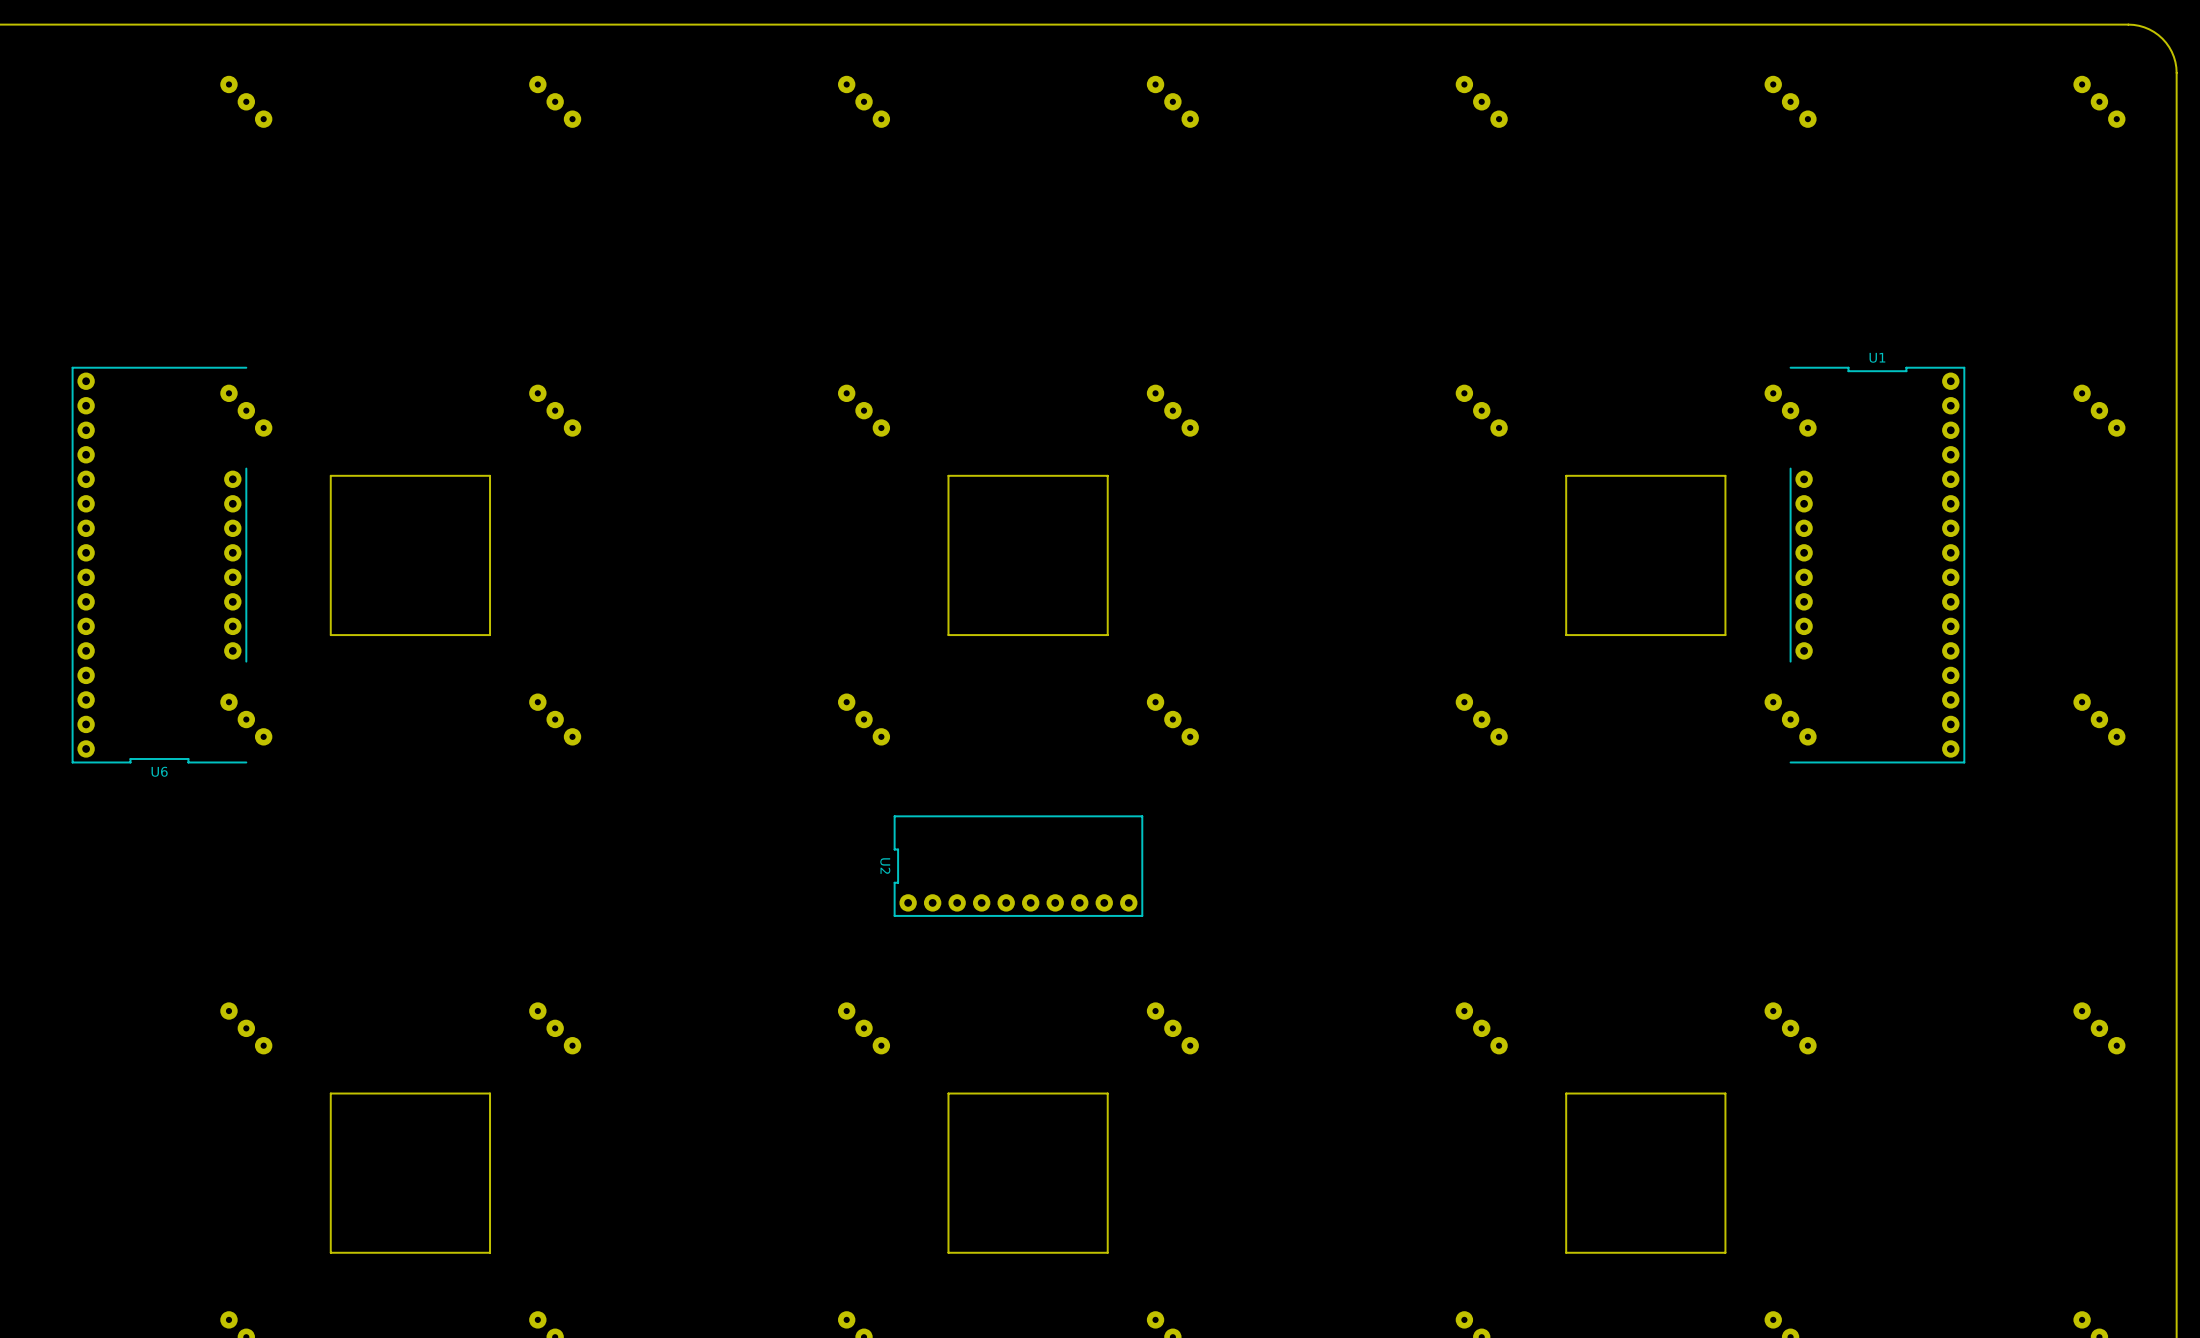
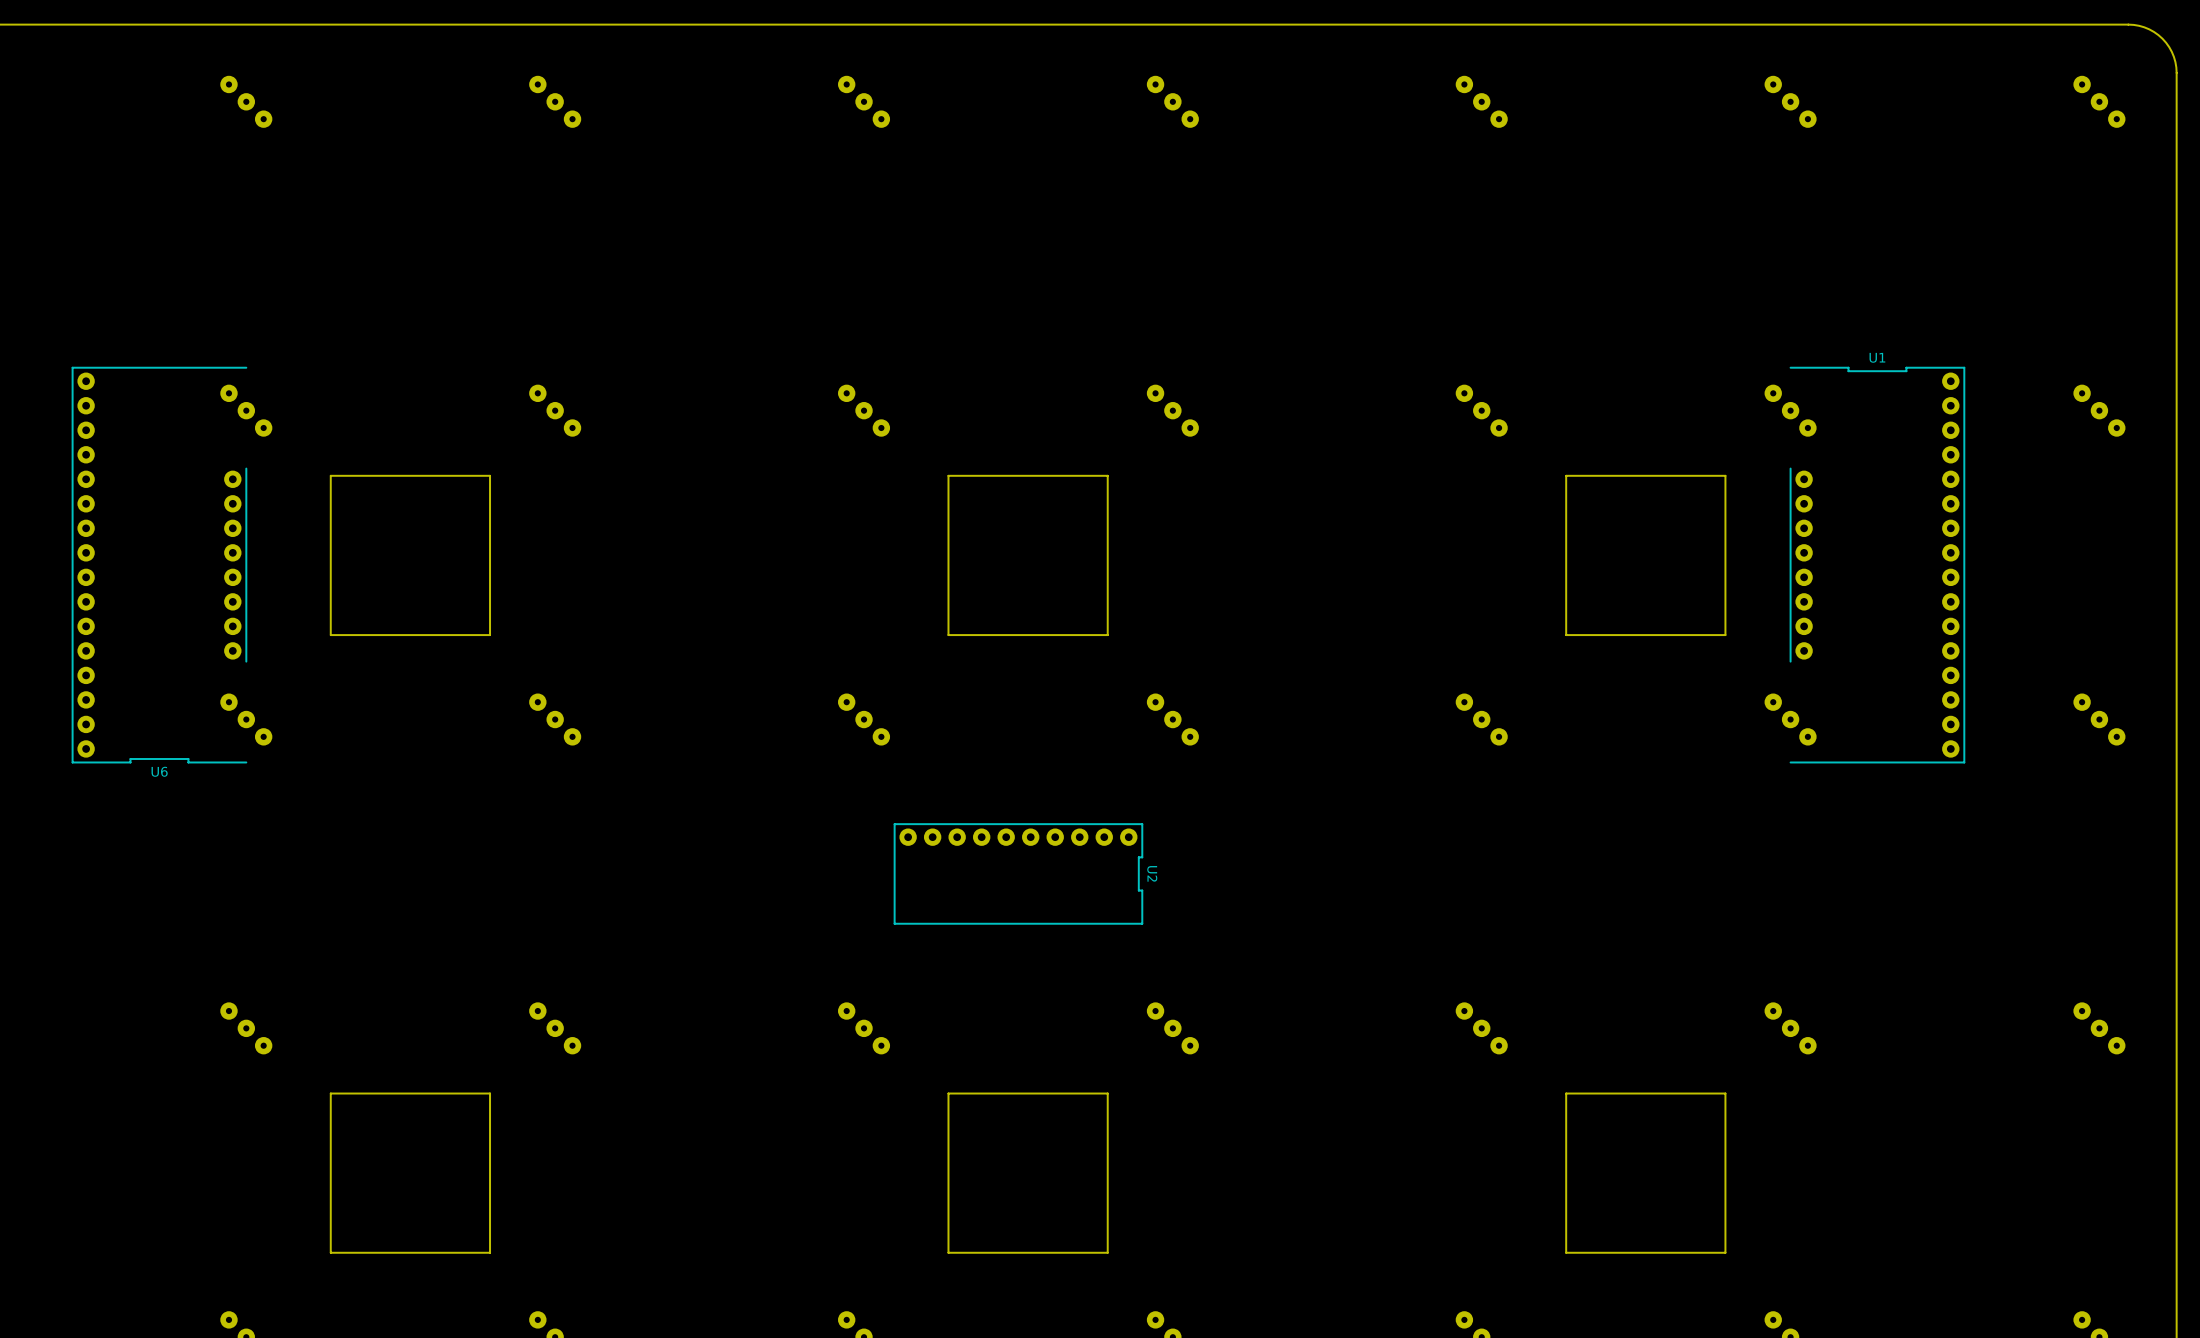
U2 rotation: 0° (1018, 866) -> 180° (1018, 873)

